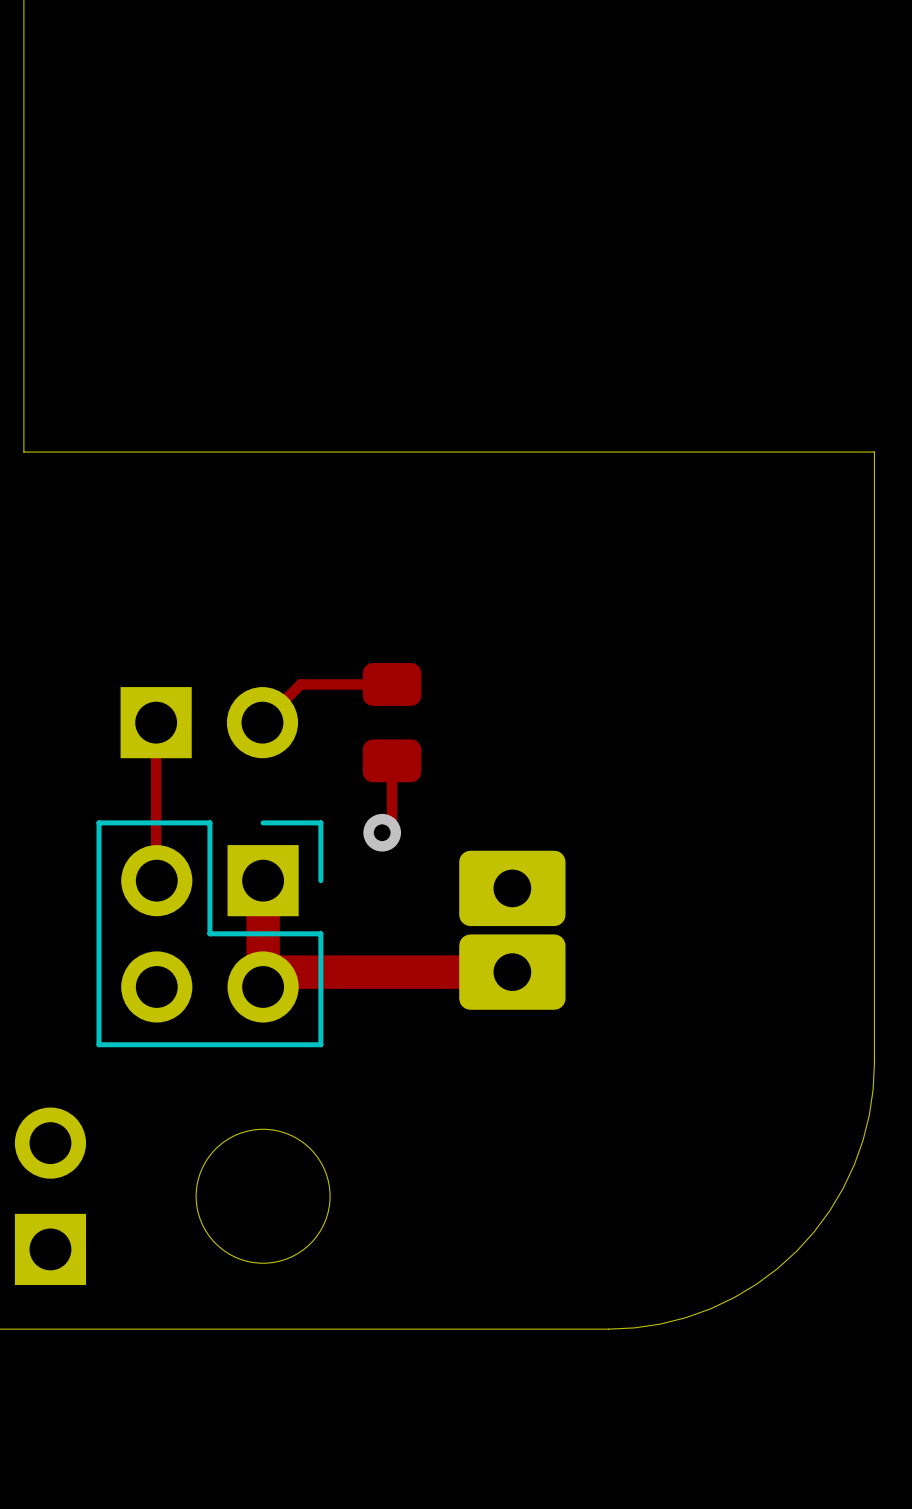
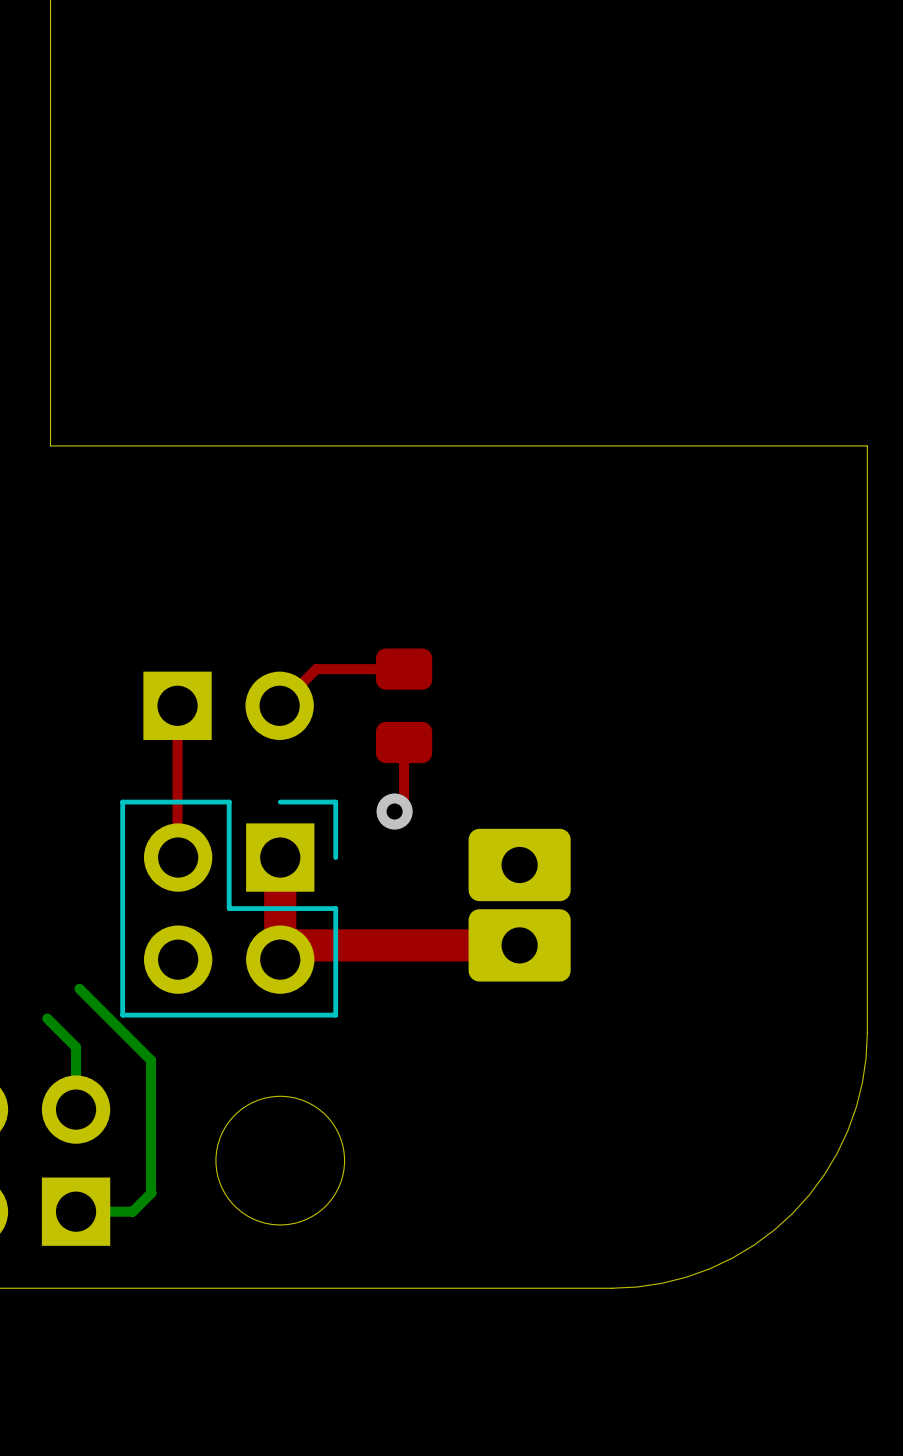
bottom track: none -> (79, 988) (151, 1060) (151, 1192)
bottom track: none -> (47, 1018) (76, 1047) (76, 1109)
bottom track: none -> (151, 1192) (132, 1211) (76, 1211)

